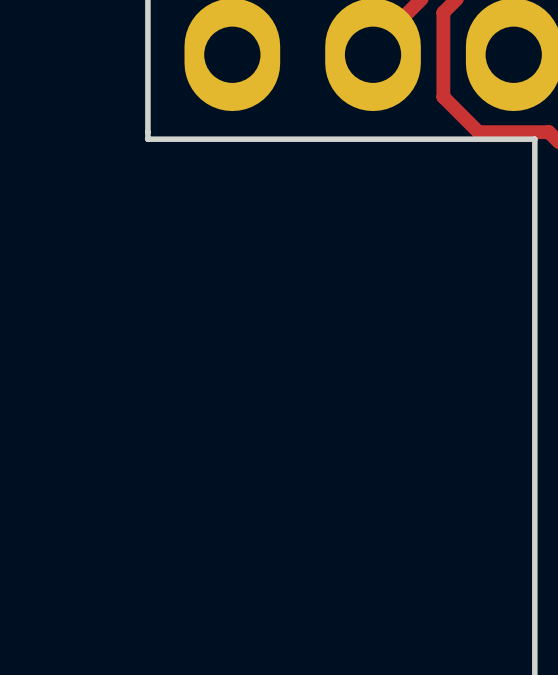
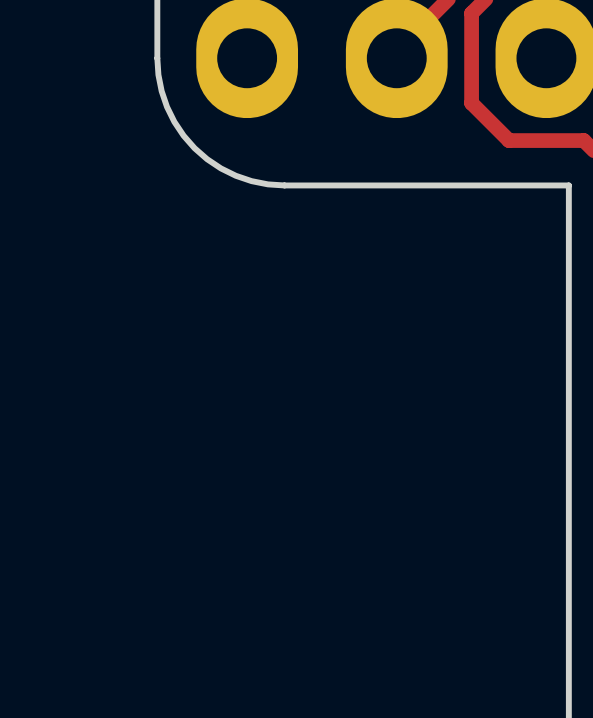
board edge: (147, 54) (147, 139) (534, 139) (534, 174) -> (157, 58) (161, 91) (174, 121) (183, 135) (207, 159) (235, 175) (251, 181) (284, 185) (568, 185)

